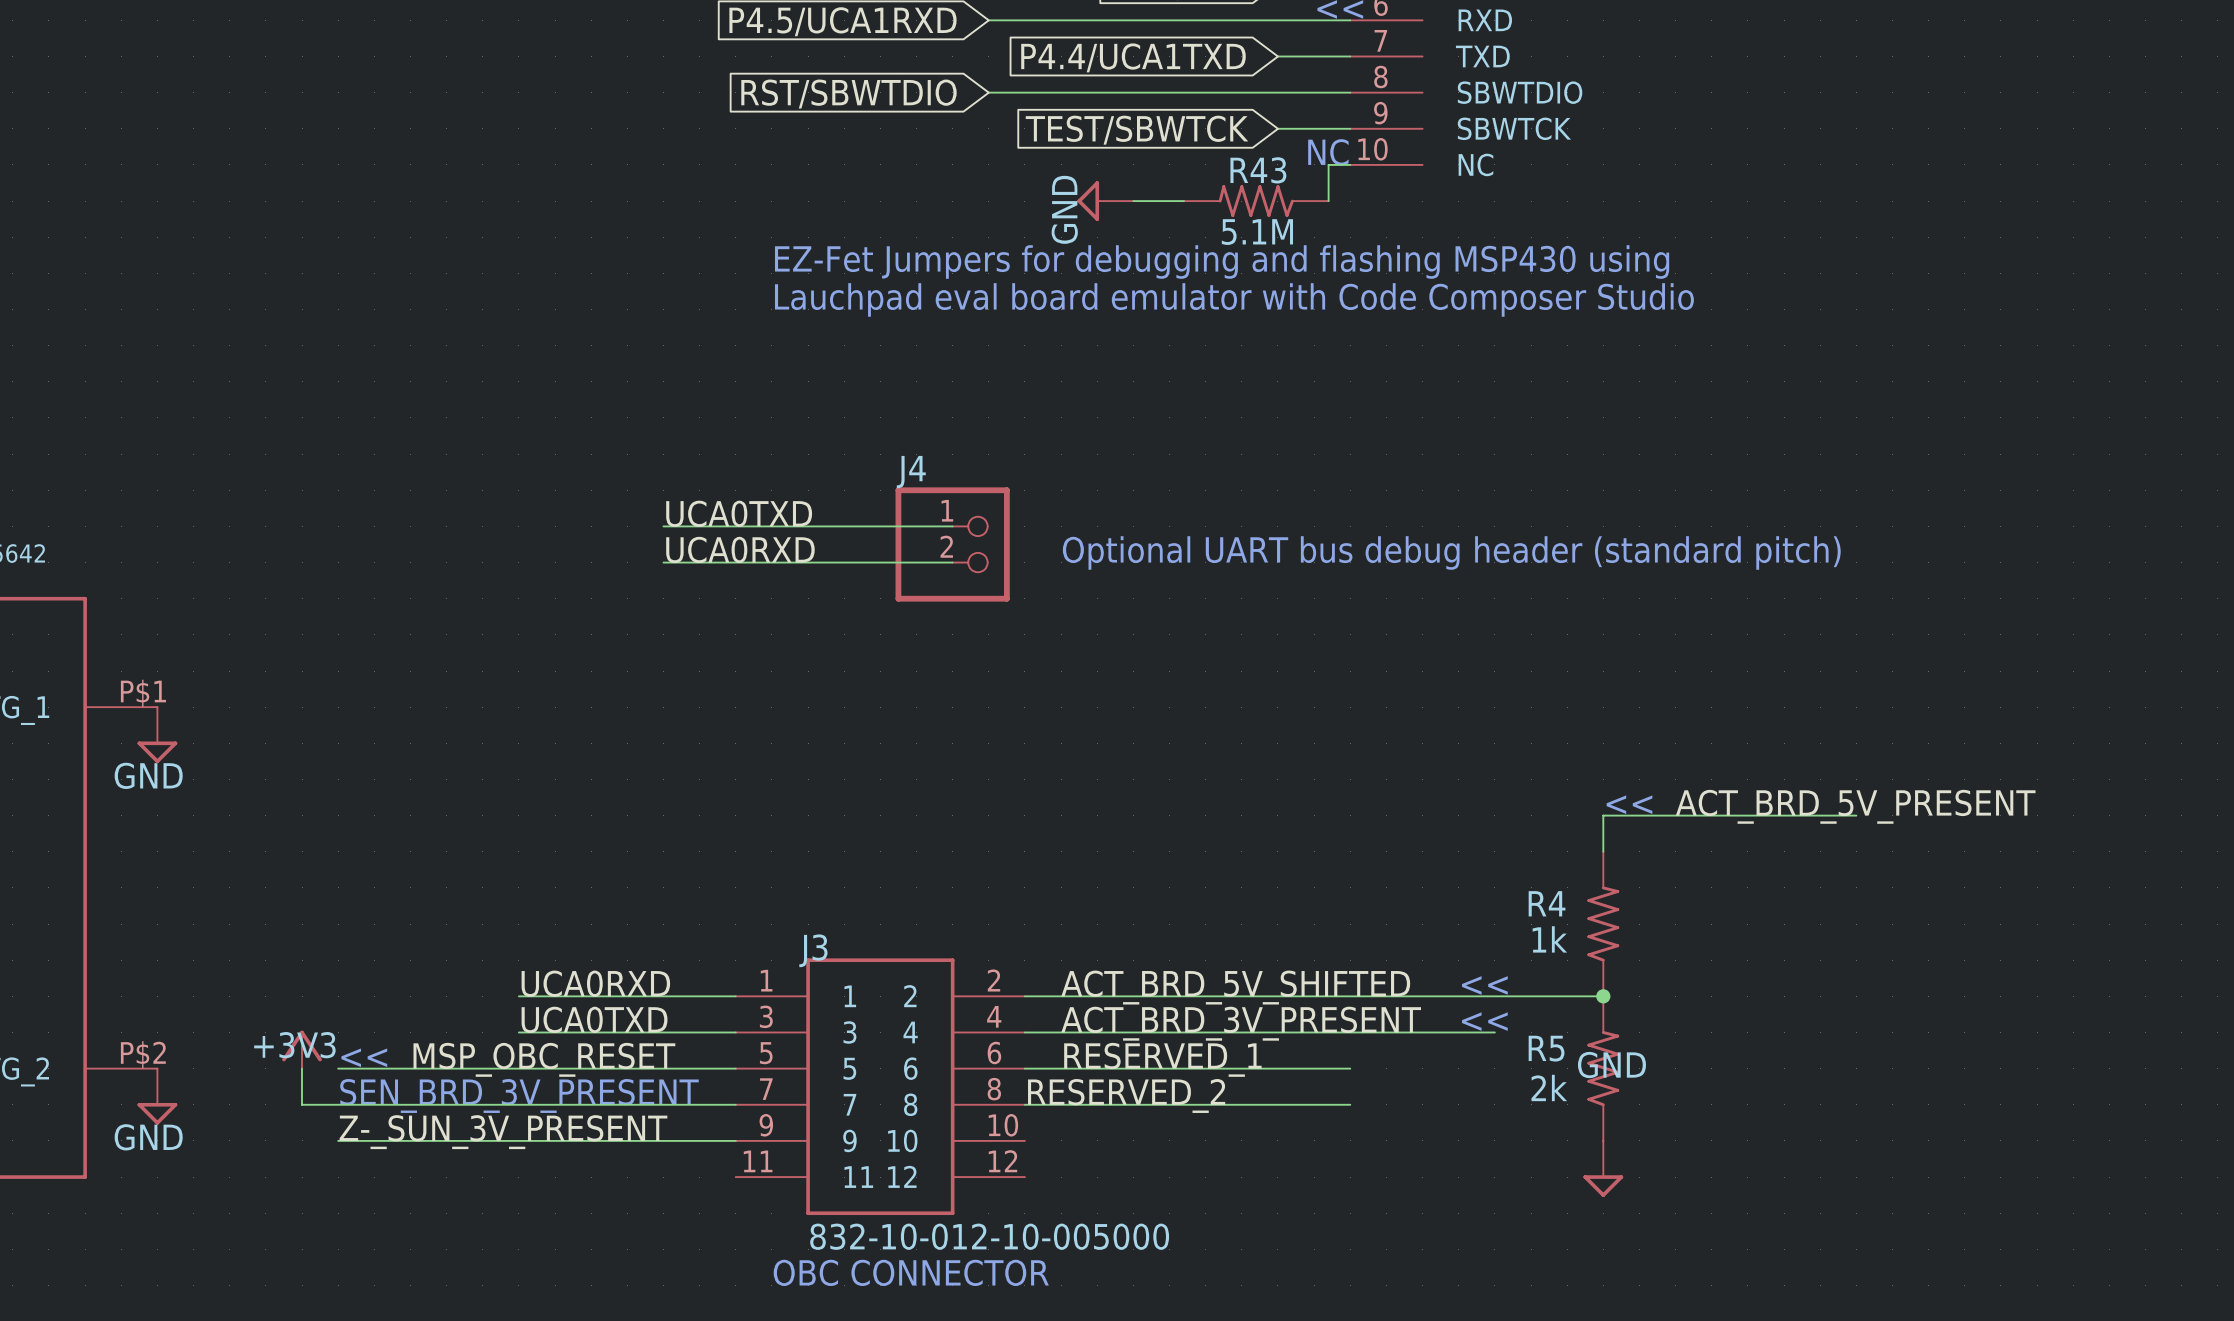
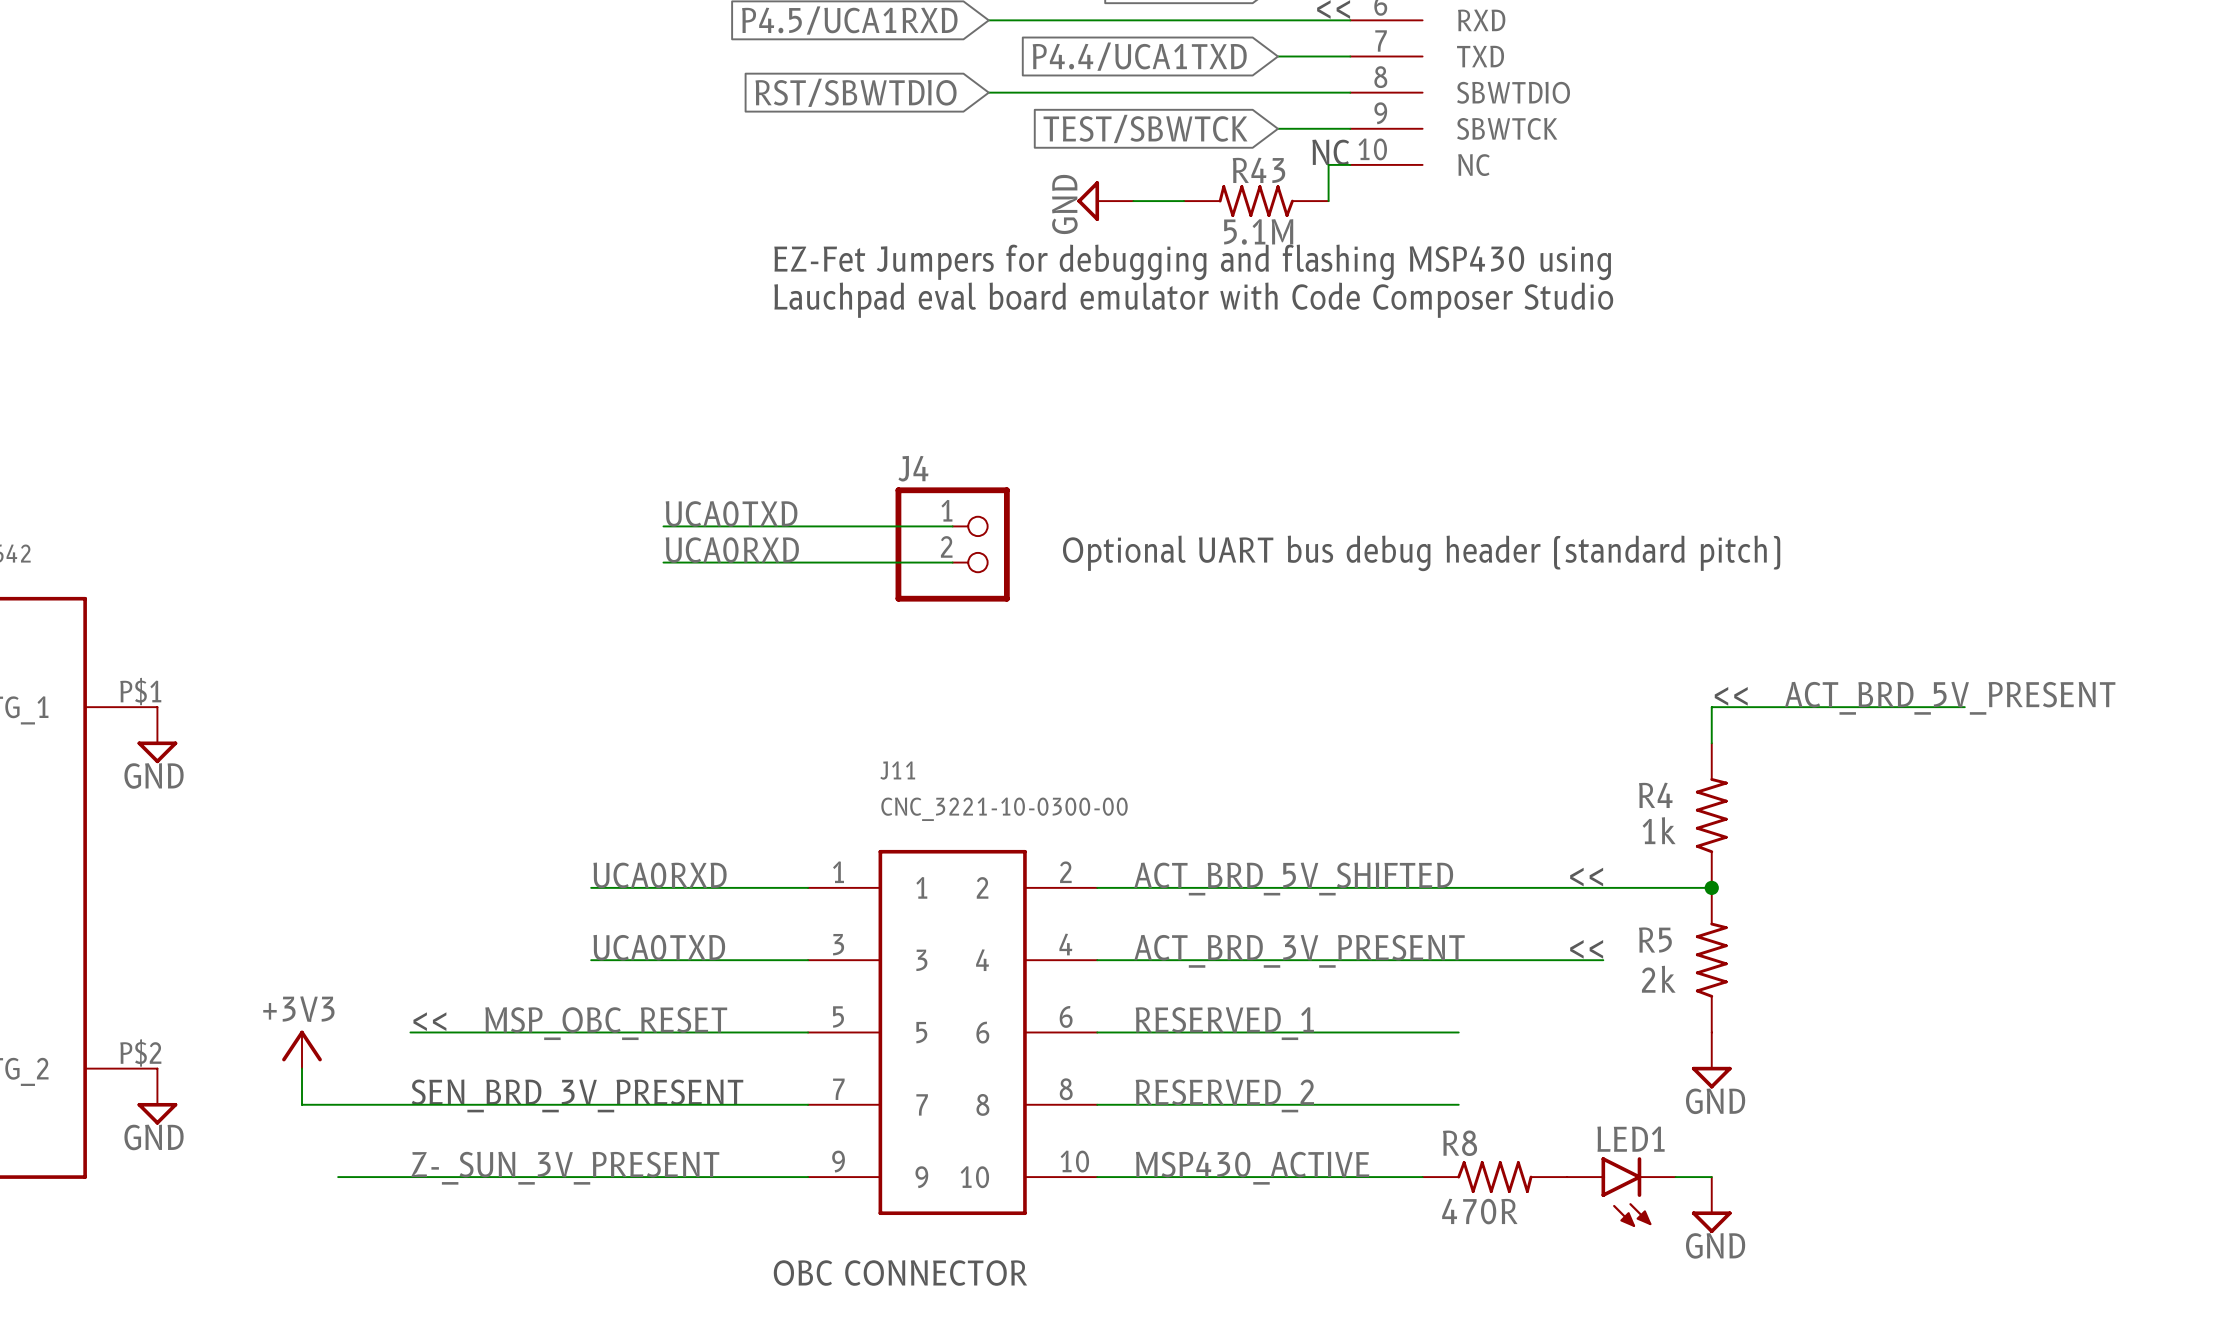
text: none -> << (1731, 696)
text: << (1629, 804) -> none
label position: ACT_BRD_5V_PRESENT (1855, 806) -> ACT_BRD_5V_PRESENT (1950, 698)
wire: (1856, 815) (1603, 815) (1603, 851) -> (1964, 707) (1711, 707) (1711, 743)
text: none -> << (1586, 877)
wire: none -> (591, 887) (808, 887)
wire: none -> (1097, 887) (1711, 887)
junction: none -> (1711, 887)
R4 position: (1603, 924) -> (1711, 815)
text: none -> << (1586, 949)
wire: none -> (1097, 960) (1603, 960)
label position: UCA0RXD (595, 983) -> UCA0RXD (660, 875)
text: << (1484, 985) -> none
label position: ACT_BRD_5V_SHIFTED (1235, 987) -> ACT_BRD_5V_SHIFTED (1293, 879)
wire: (518, 996) (735, 996) -> (591, 960) (808, 960)
wire: (1024, 996) (1603, 996) -> none
junction: (1603, 996) -> none
label position: UCA0TXD (594, 1019) -> UCA0TXD (659, 947)
text: << (1484, 1021) -> none
label position: ACT_BRD_3V_PRESENT (1241, 1023) -> ACT_BRD_3V_PRESENT (1299, 951)
wire: none -> (410, 1032) (518, 1032)
J11: none -> CNC_3221-10-0300-00 (952, 1032)
wire: (1458, 1032) (1494, 1032) -> (1675, 1177) (1711, 1177)
power symbol text position: +3V3 (294, 1045) -> +3V3 (298, 1009)
text position: << (364, 1057) -> << (429, 1021)
label position: MSP_OBC_RESET (544, 1059) -> MSP_OBC_RESET (606, 1023)
label position: RESERVED_1 (1162, 1059) -> RESERVED_1 (1224, 1023)
power symbol: none -> GND (1711, 1060)
wire: (338, 1068) (735, 1068) -> none
wire: (1024, 1068) (1350, 1068) -> (1097, 1177) (1422, 1177)
R5 position: (1603, 1068) -> (1711, 960)
J3: 832-10-012-10-005000 (880, 1086) -> none
text position: SEN_BRD_3V_PRESENT (519, 1095) -> SEN_BRD_3V_PRESENT (577, 1095)
label position: RESERVED_2 (1126, 1095) -> RESERVED_2 (1224, 1095)
wire: none -> (1350, 1104) (1458, 1104)
label position: Z-_SUN_3V_PRESENT (503, 1132) -> Z-_SUN_3V_PRESENT (565, 1168)
wire: (338, 1140) (735, 1140) -> none
label: none -> MSP430_ACTIVE (1252, 1168)
power symbol: GND (1603, 1168) -> none
wire: none -> (338, 1177) (808, 1177)
R8: none -> 470R (1494, 1177)
LED1: none -> (1621, 1192)
power symbol: none -> GND (1711, 1205)

